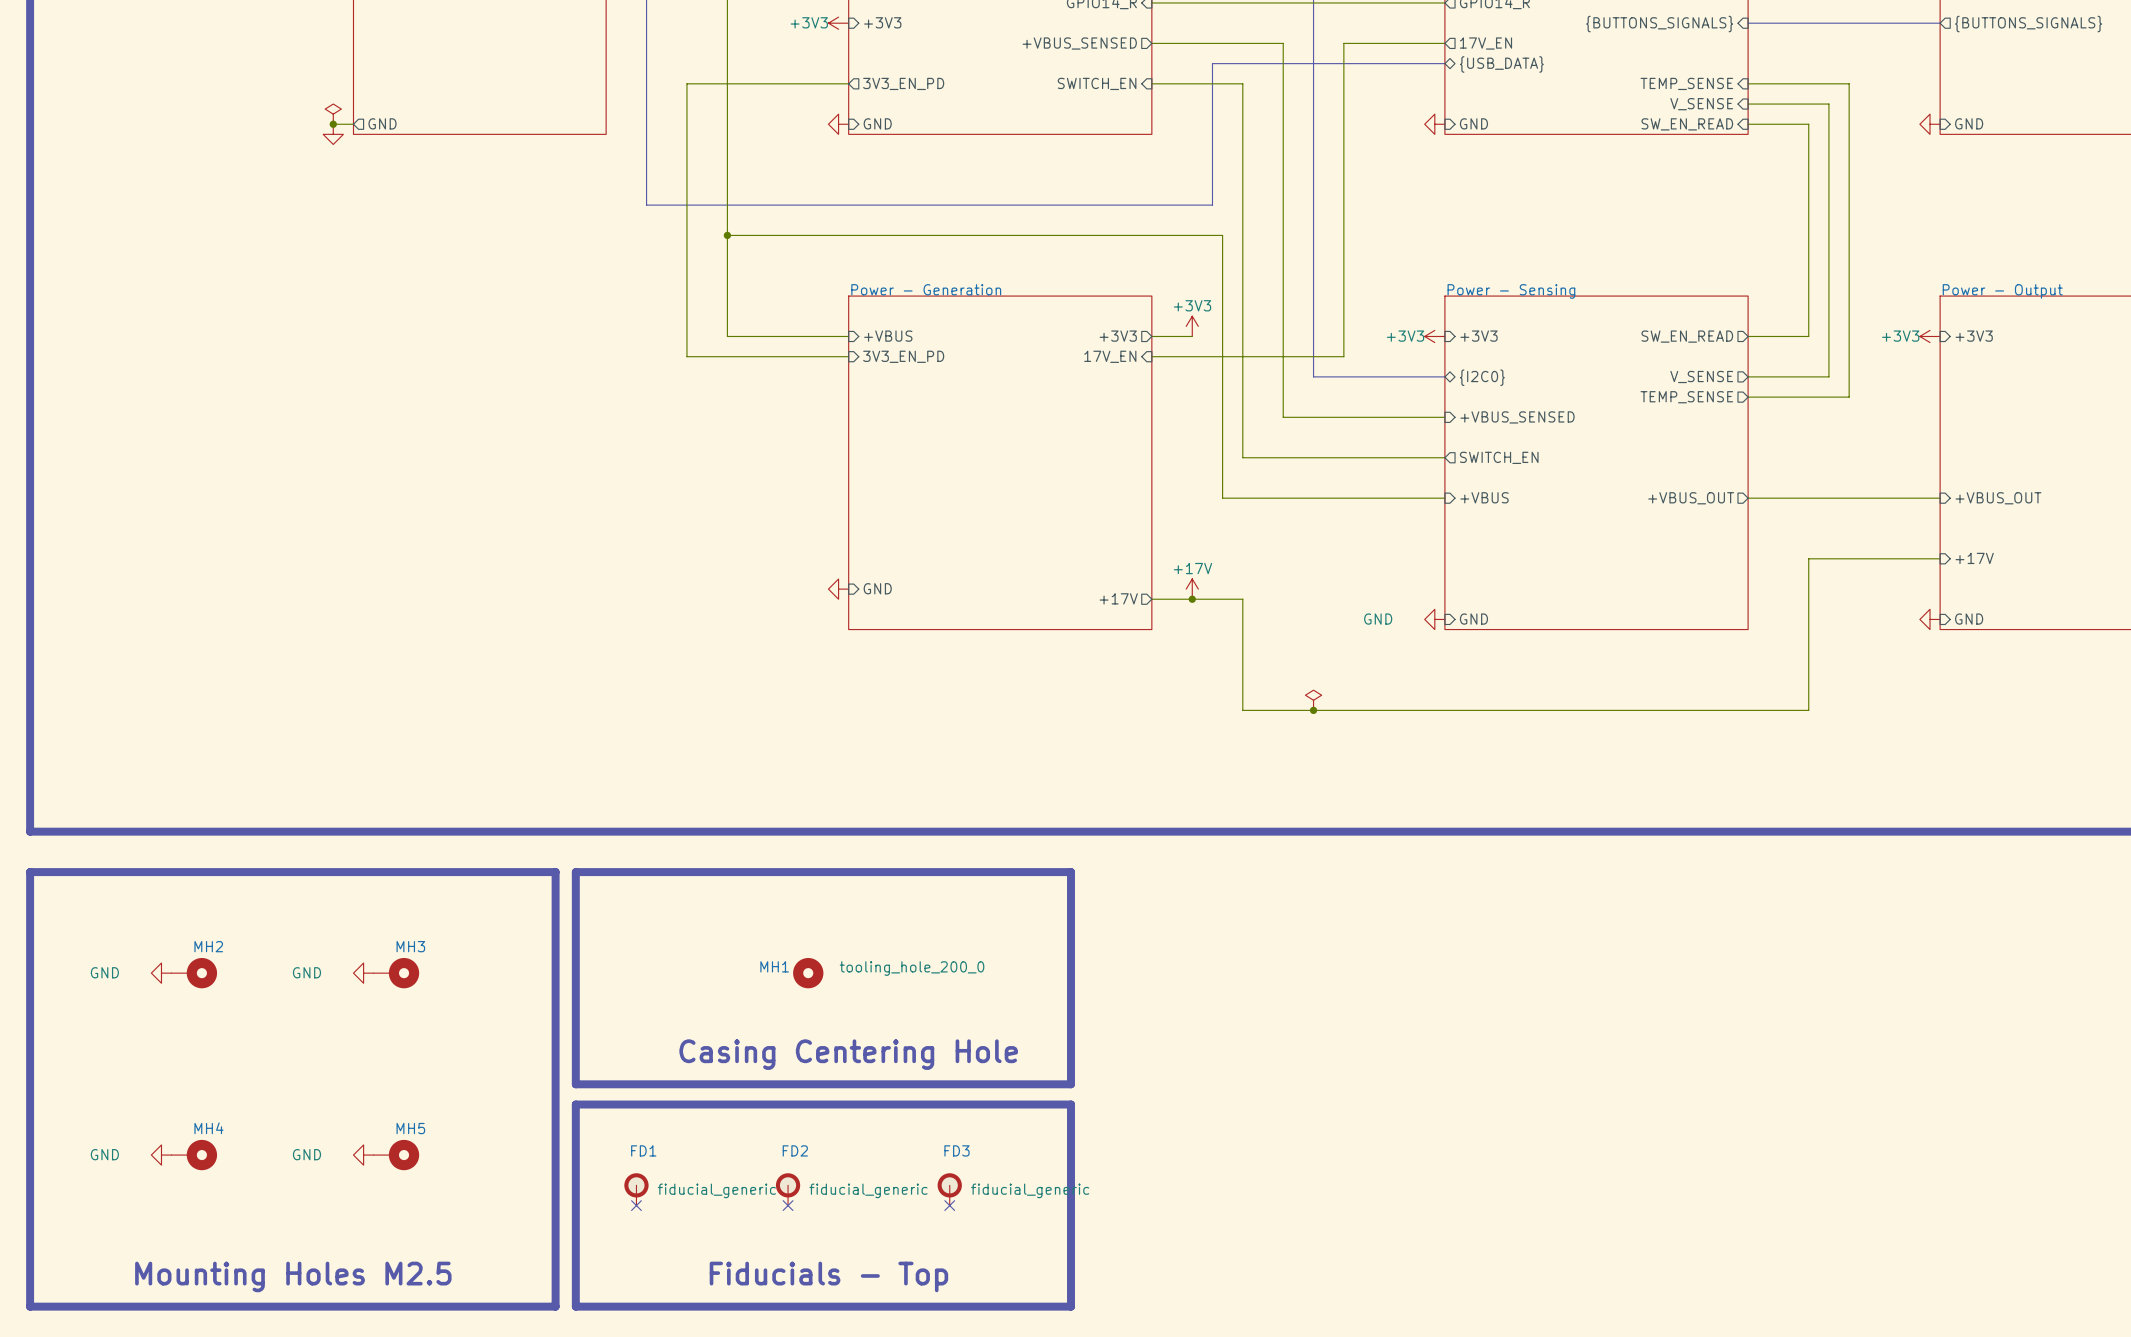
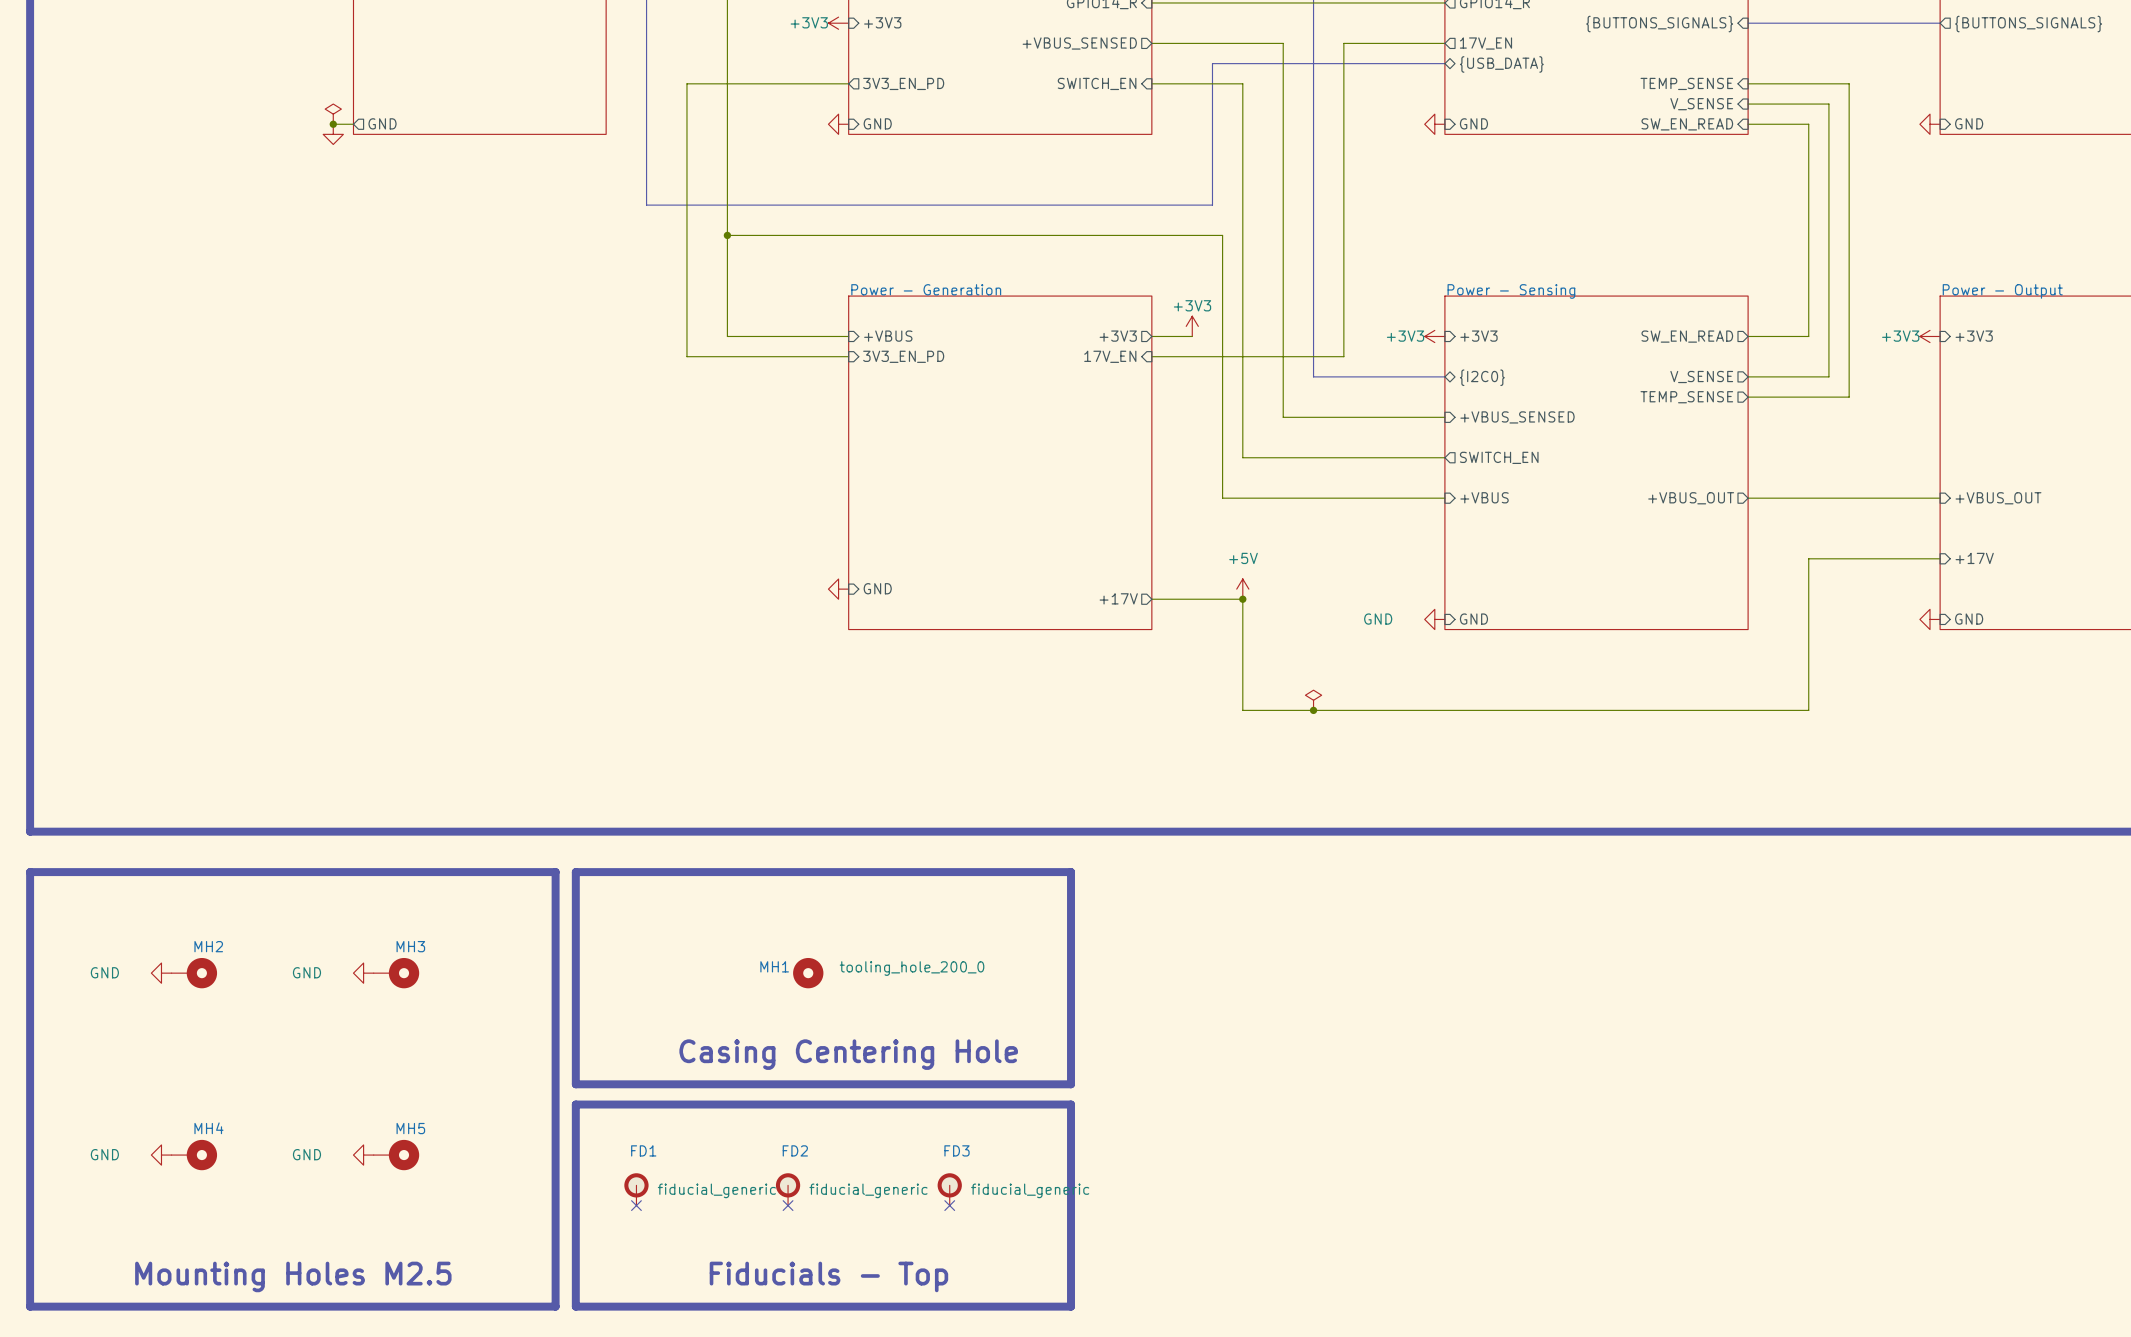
power symbol: +17V (1192, 589) -> none
power symbol: none -> +5V (1242, 589)
junction: (1192, 599) -> none
junction: none -> (1242, 599)

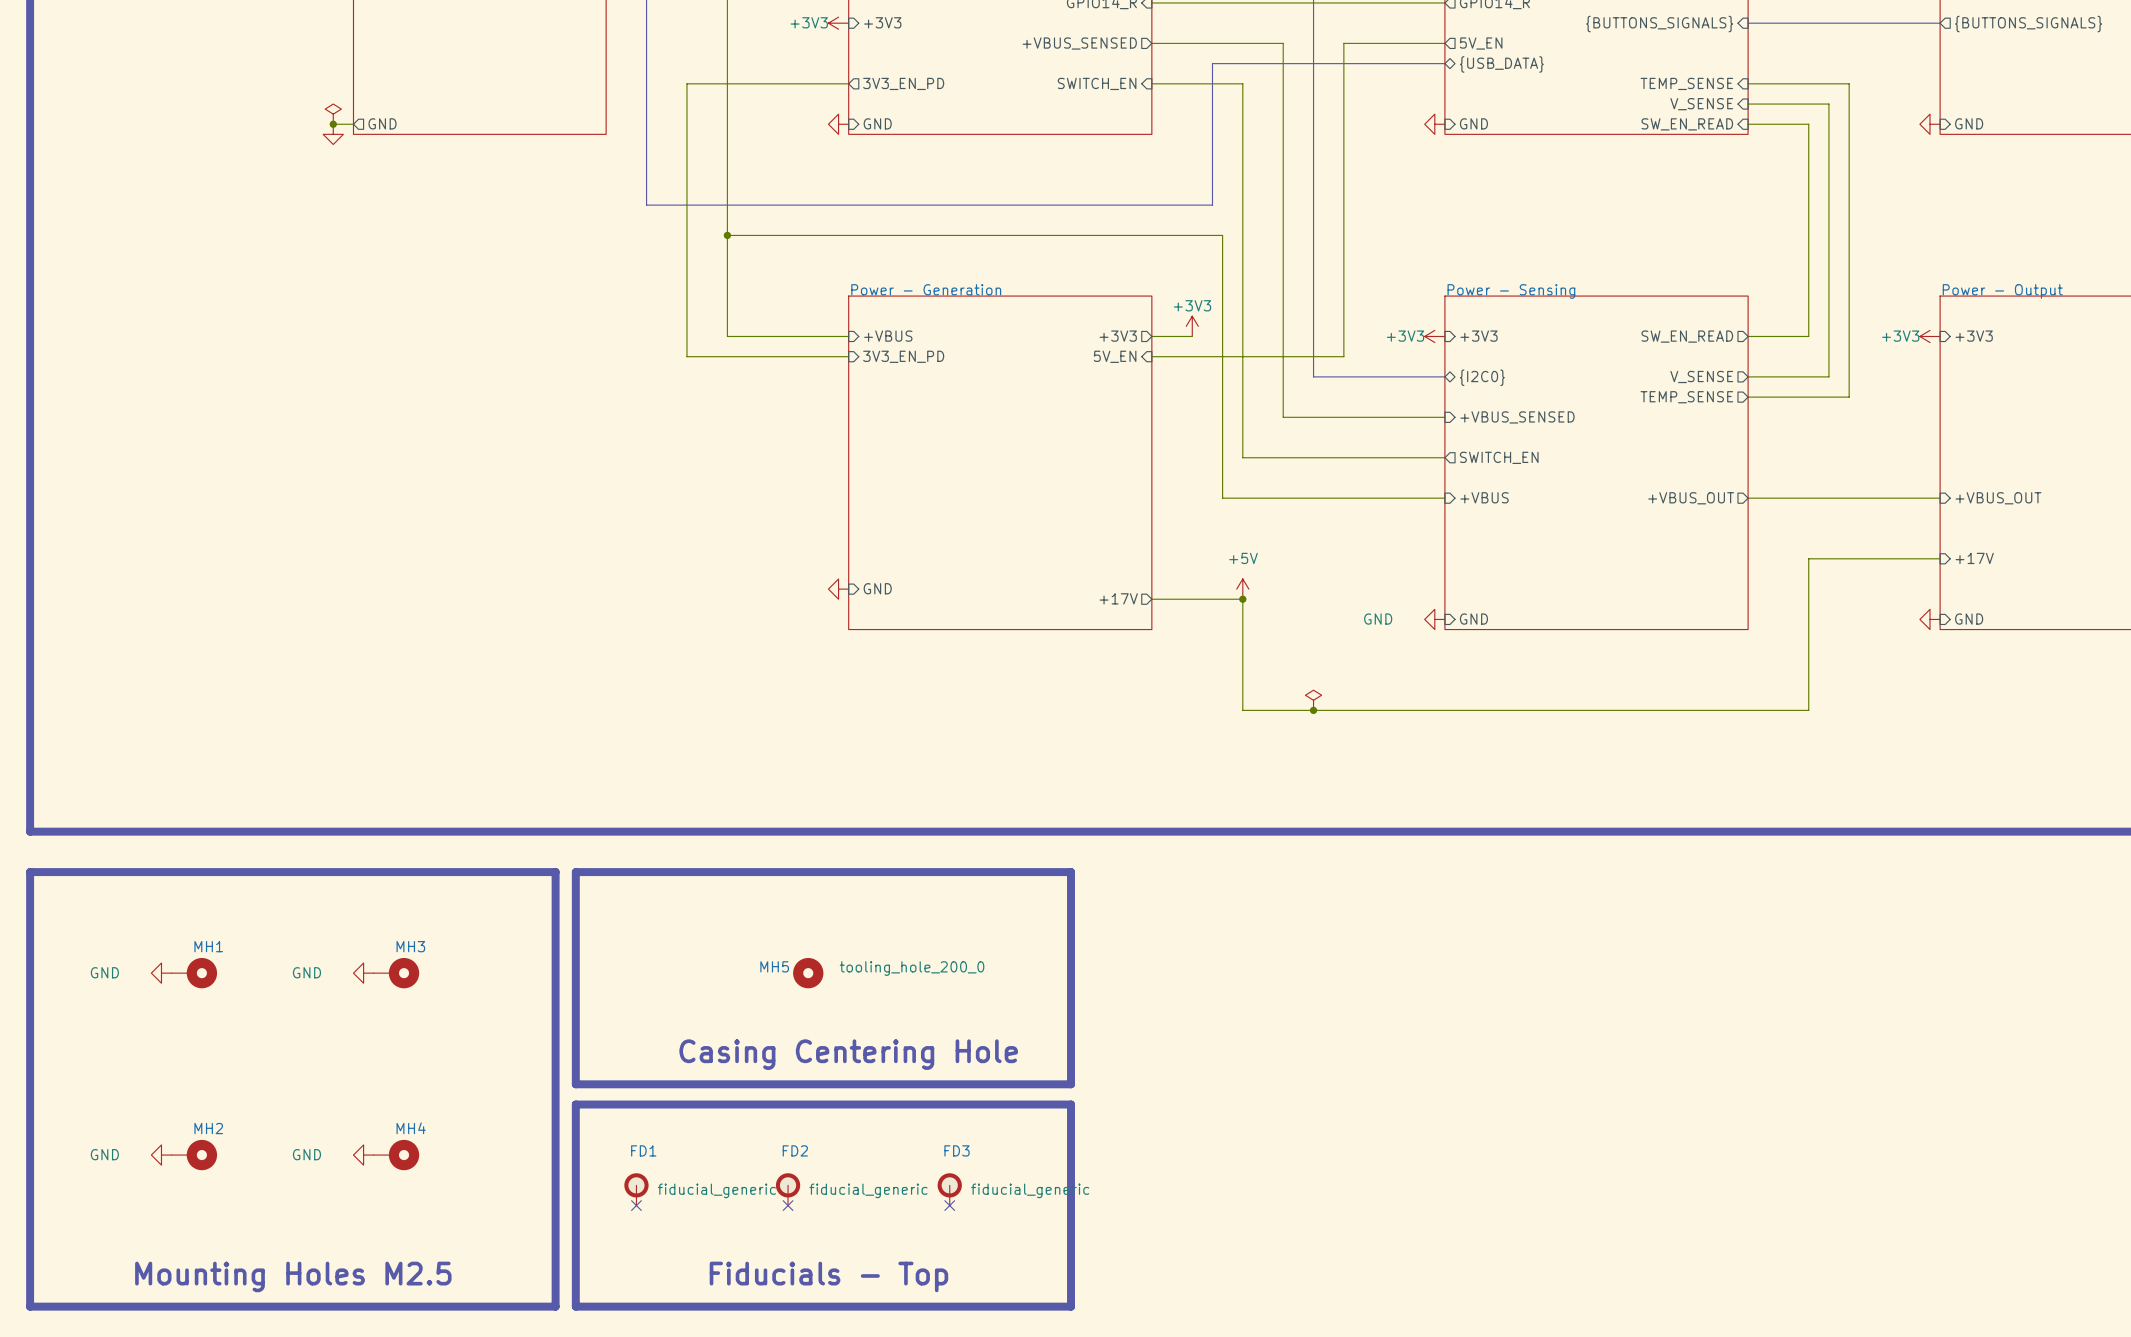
sheet pin: 17V_EN (1485, 43) -> 5V_EN (1481, 43)
sheet pin: 17V_EN (1110, 356) -> 5V_EN (1115, 356)
MH2 name: MH2 (208, 946) -> MH1 (208, 946)
MH1 name: MH1 (774, 966) -> MH5 (774, 966)
MH4 name: MH4 (208, 1128) -> MH2 (208, 1128)
MH5 name: MH5 (410, 1128) -> MH4 (411, 1128)

